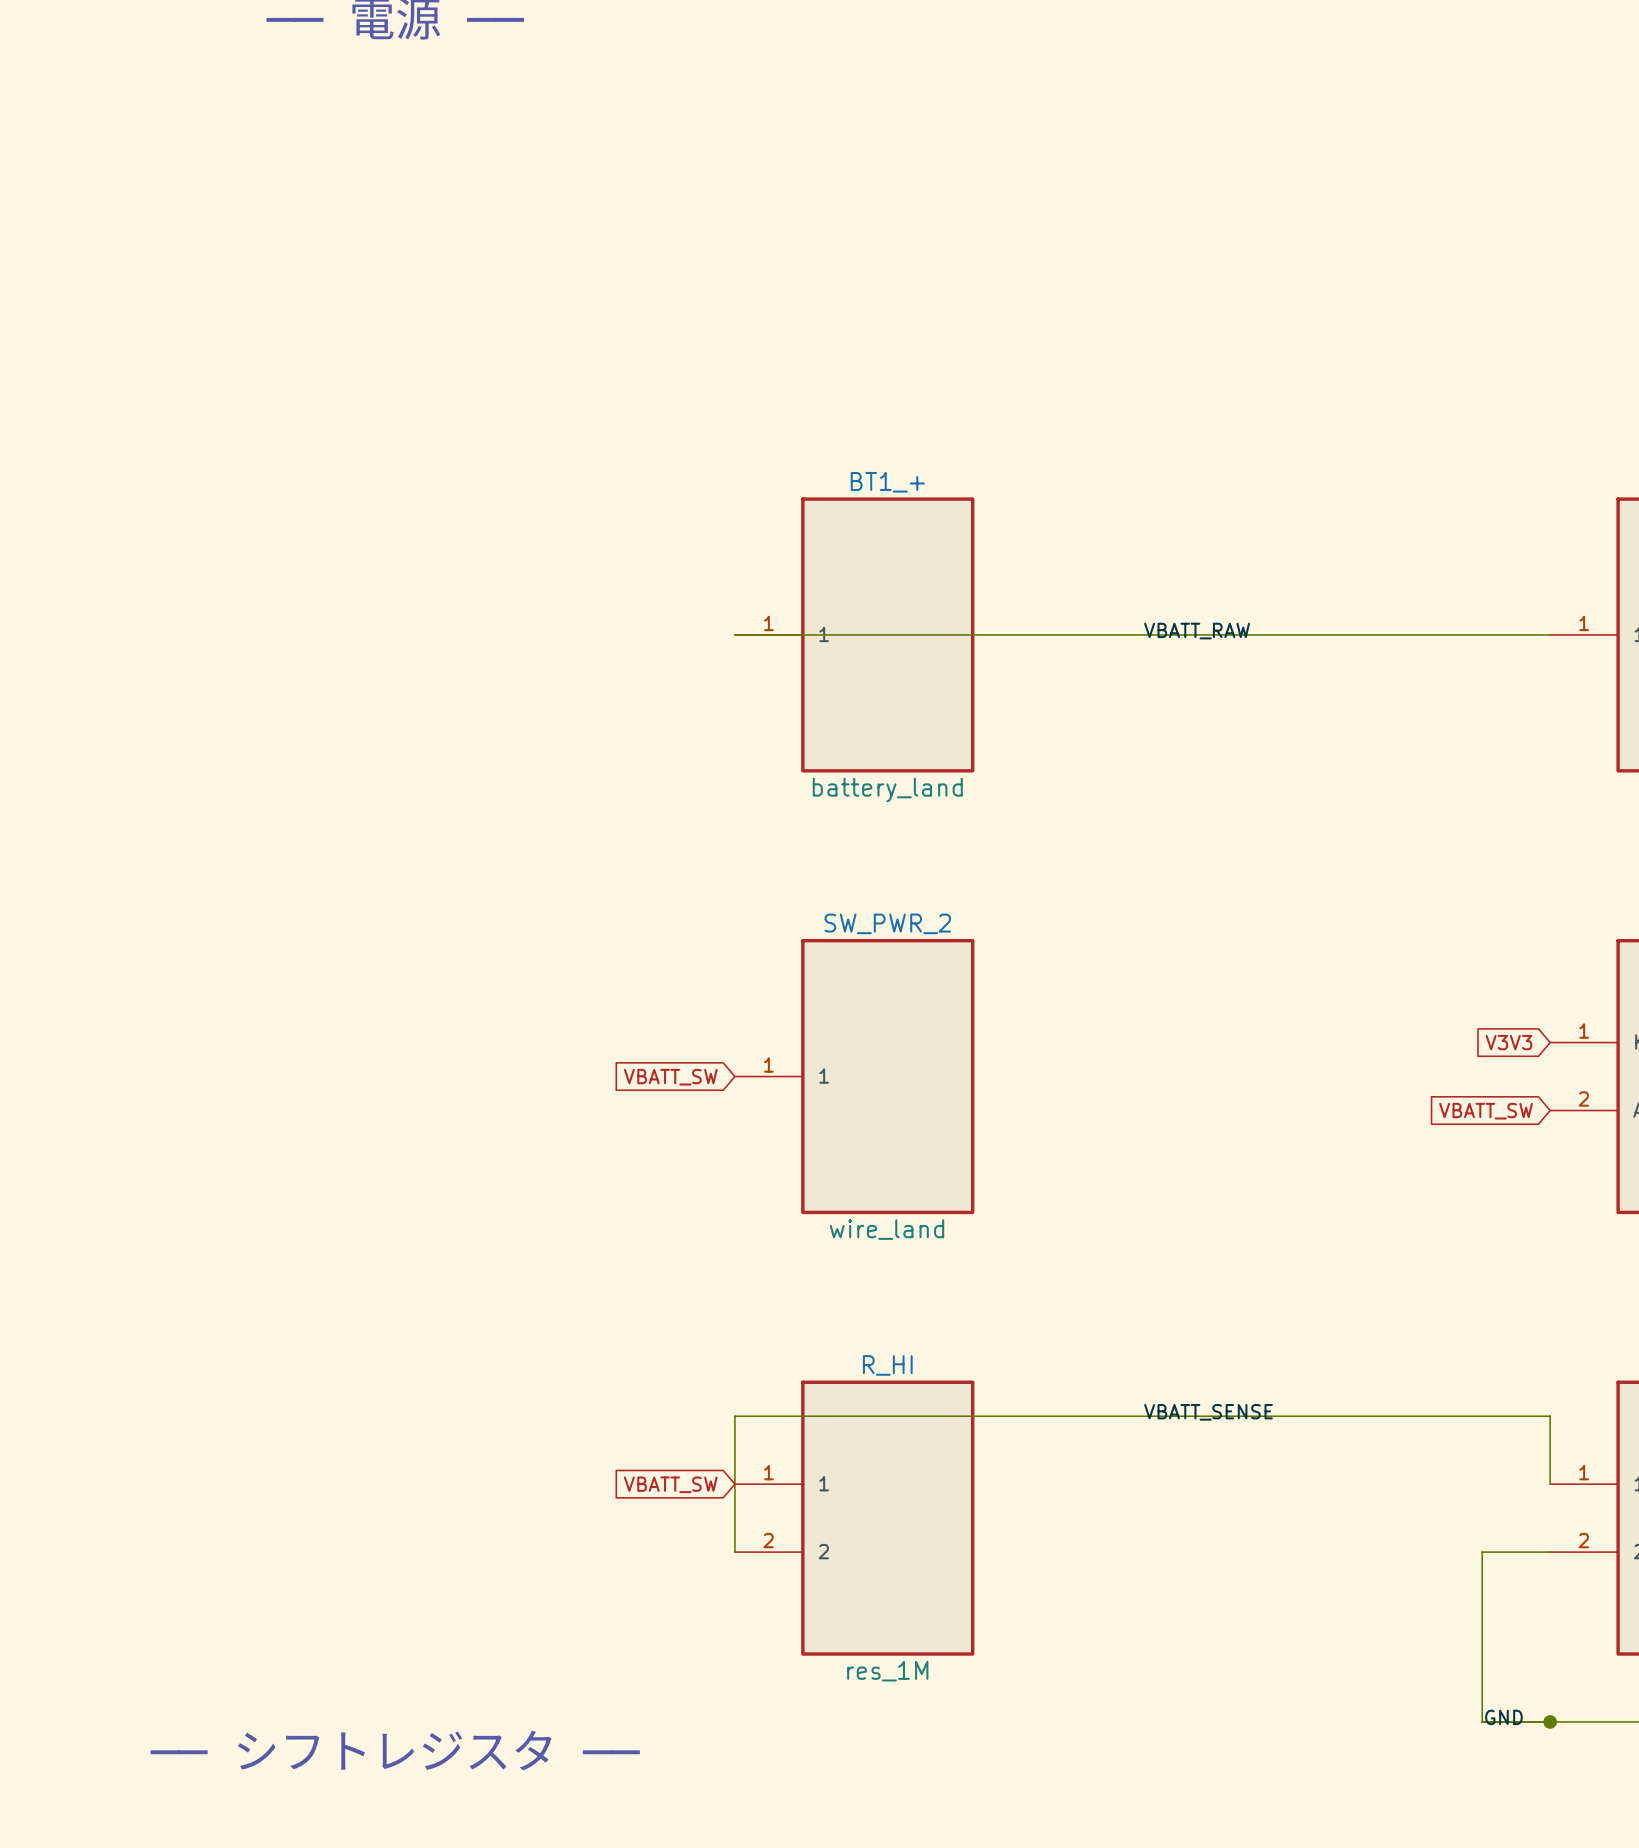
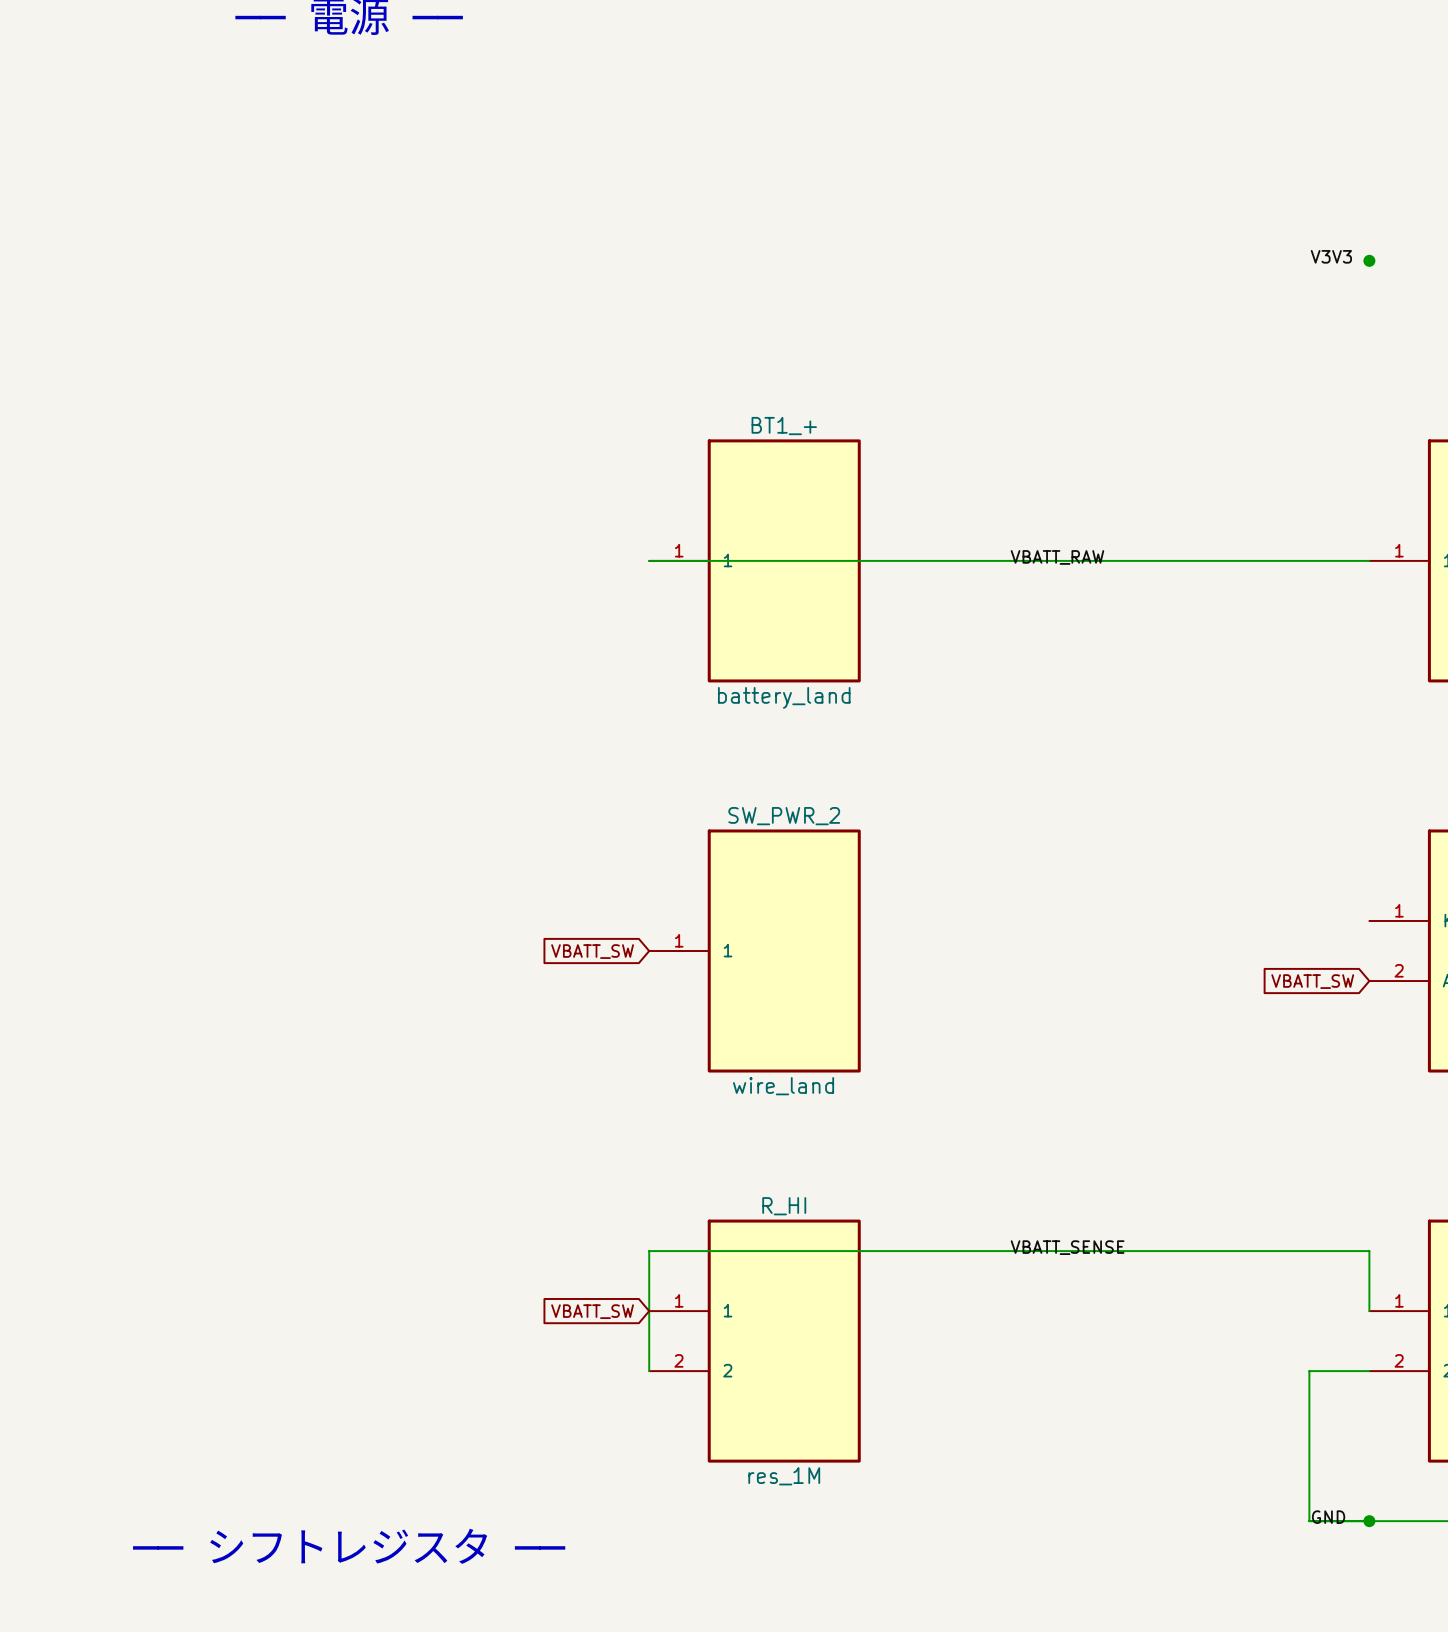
label: none -> V3V3 (1331, 256)
junction: none -> (1369, 260)
global label: V3V3 (1508, 1042) -> none

